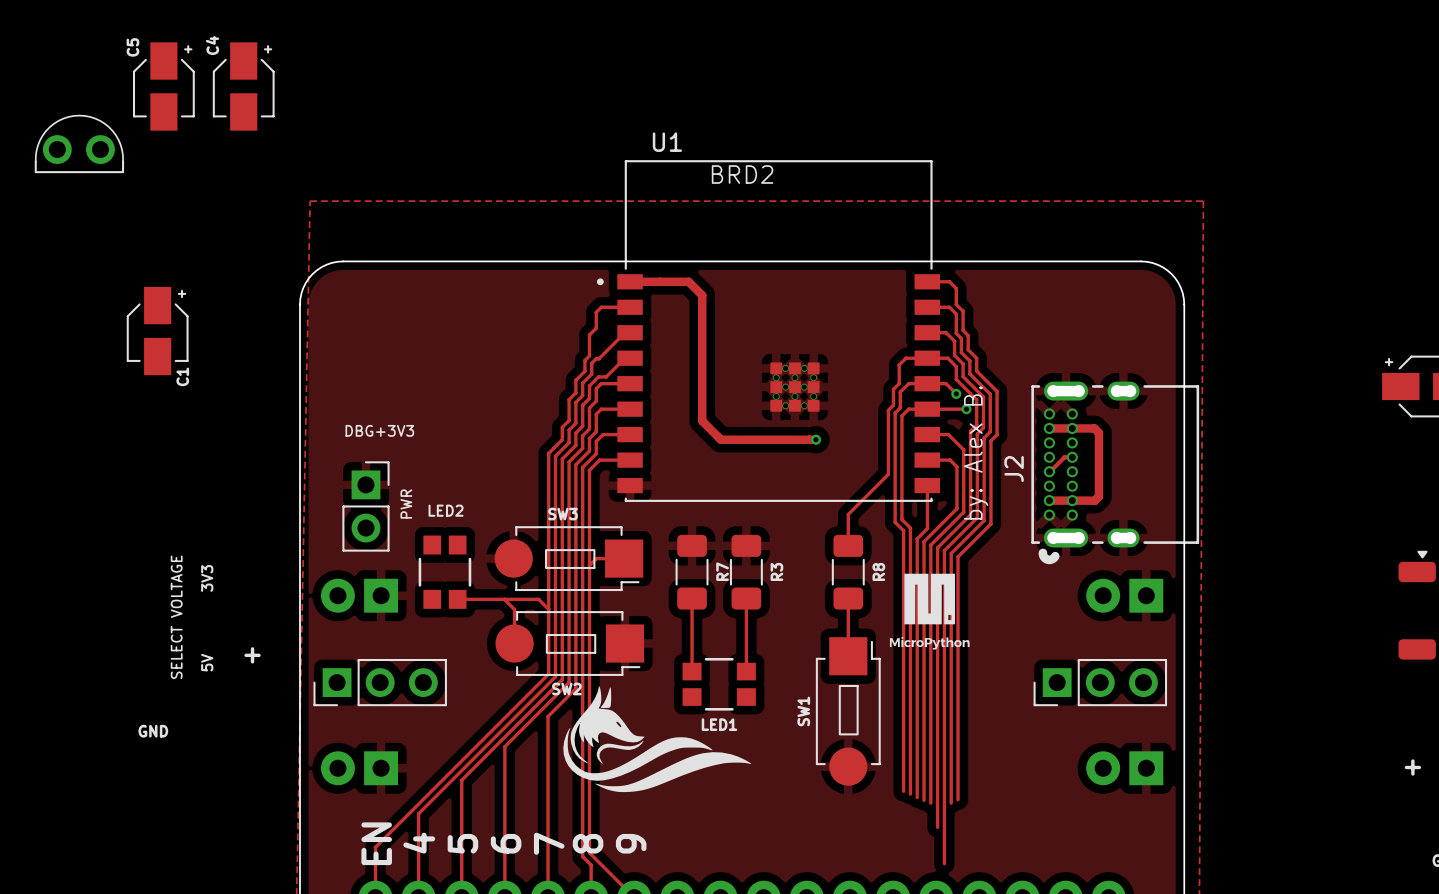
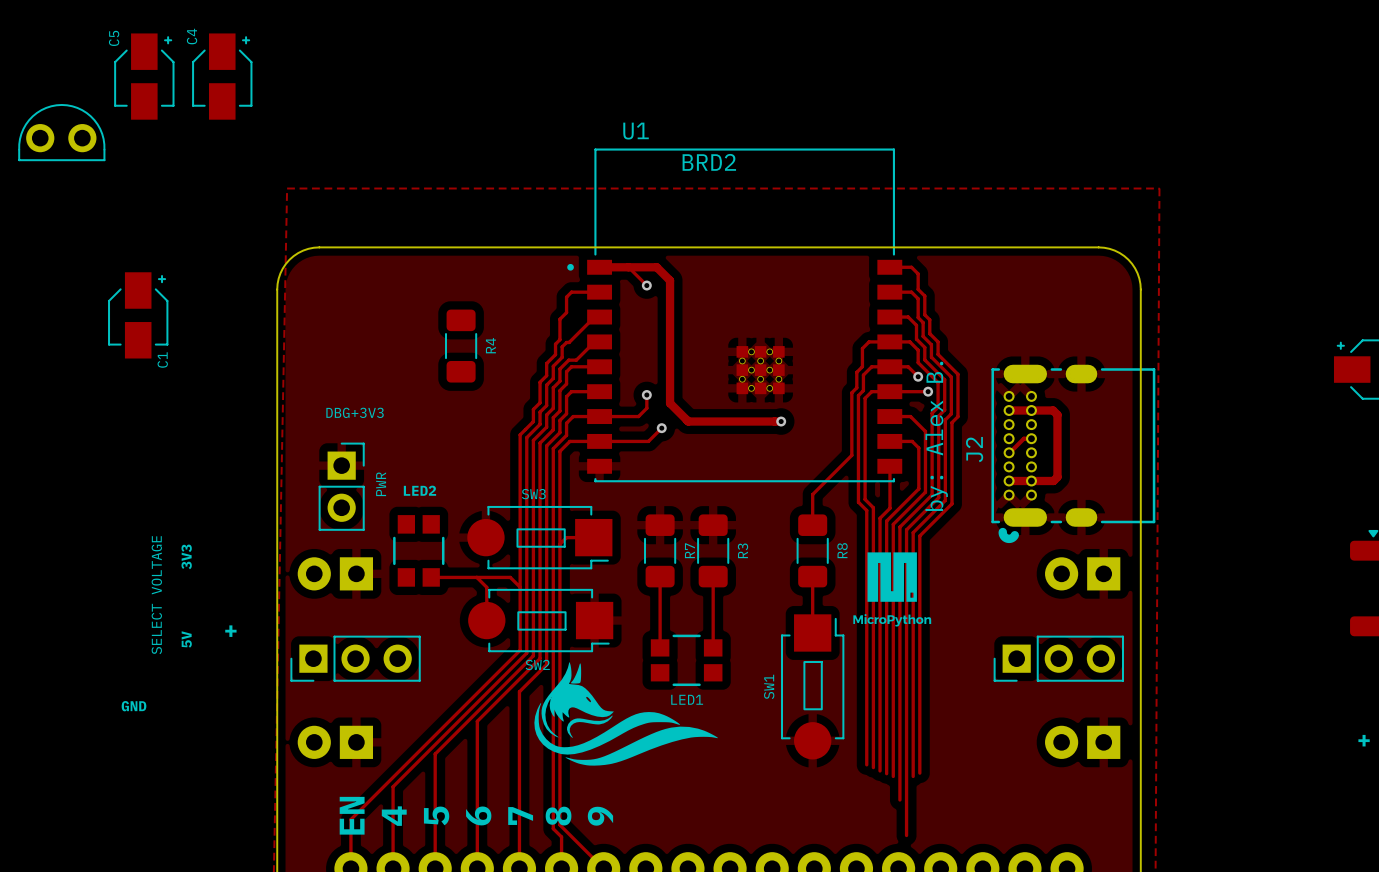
track: none -> (628, 267) (646, 285)
via: none -> (646, 285)
R4: none -> (461, 346)
track: none -> (646, 394) (646, 408) (638, 416) (599, 416)
via: none -> (646, 394)
track: none -> (661, 428) (648, 441) (599, 441)
via: none -> (661, 428)

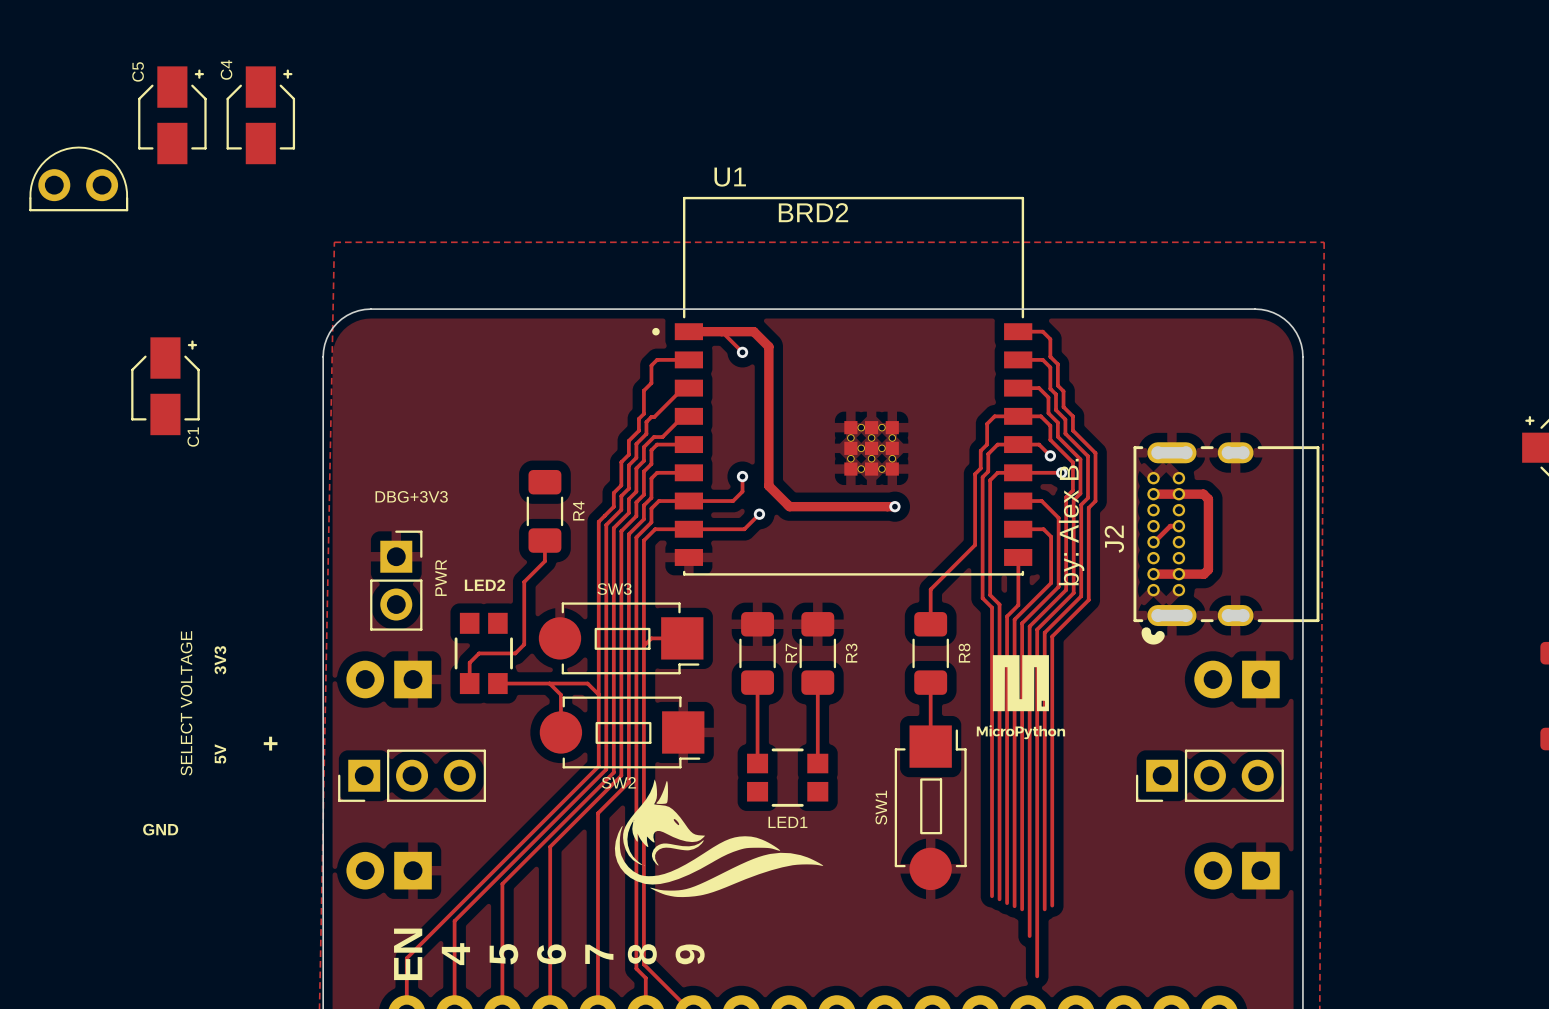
R4 position: (461, 346) -> (544, 511)
track: none -> (544, 540) (544, 561) (524, 581) (524, 644) (515, 653) (479, 653) (469, 662) (469, 683)

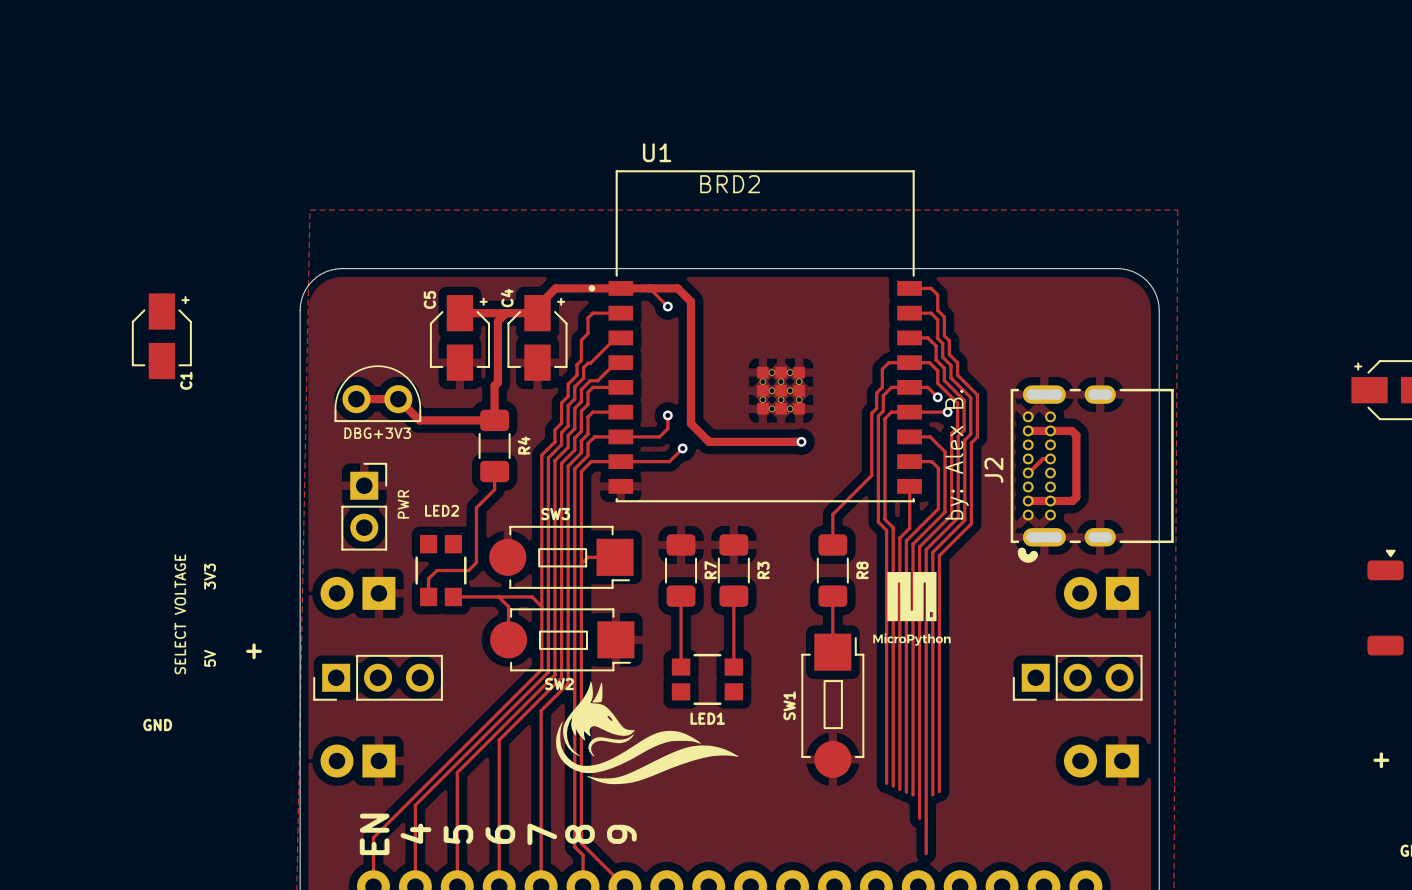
C5 position: (172, 115) -> (459, 337)
C4 position: (260, 115) -> (537, 337)
part position: (78, 178) -> (377, 393)
track: none -> (620, 288) (555, 288) (530, 313) (459, 313)
track: none -> (506, 313) (497, 321) (497, 382) (494, 385) (494, 420) (419, 420) (398, 399) (356, 399)

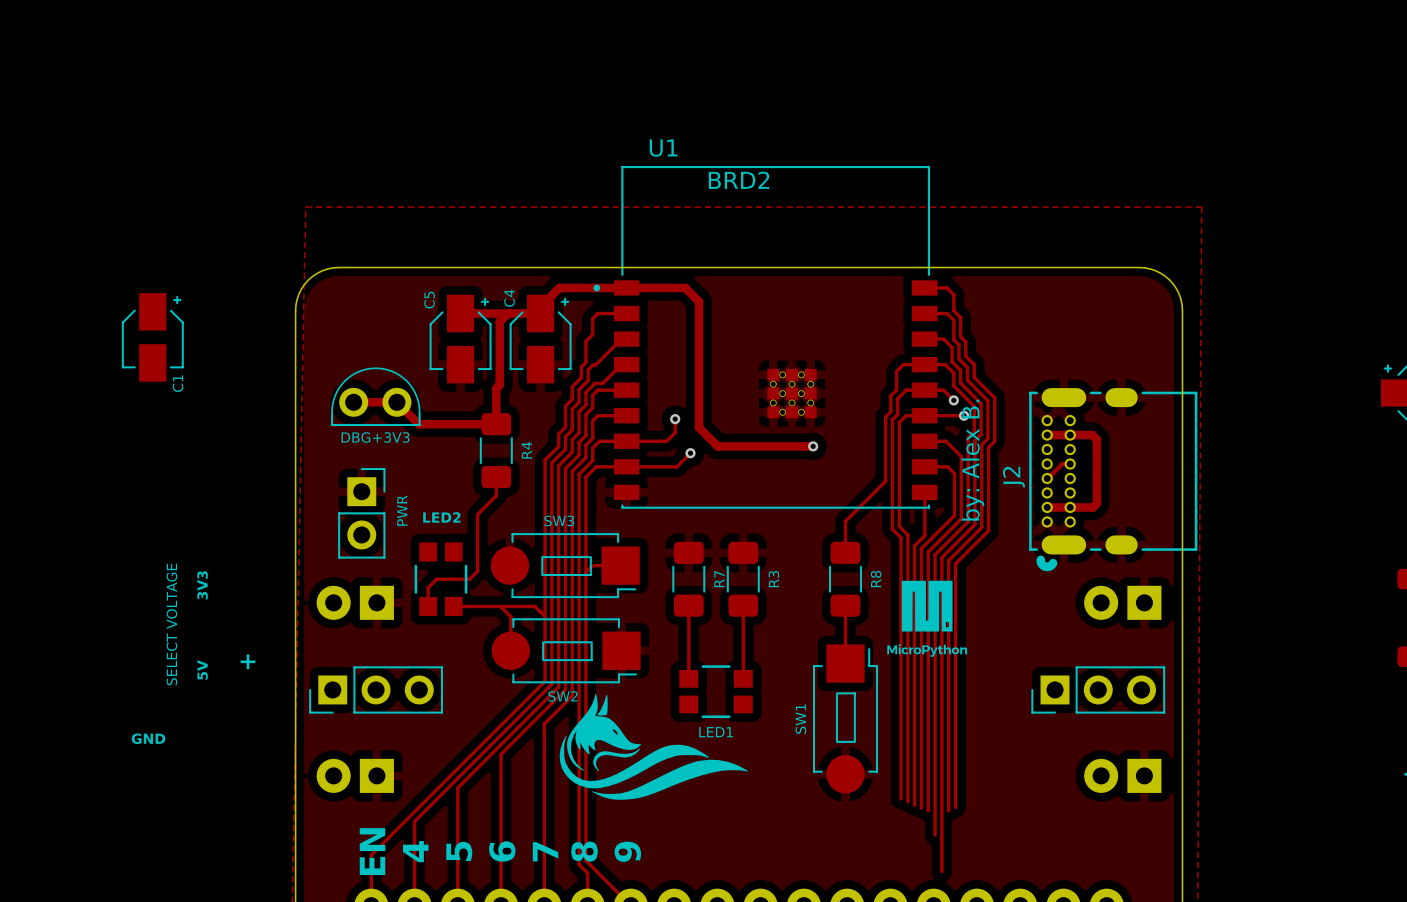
track: (649, 288) (667, 306) -> none
via: (667, 306) -> none

